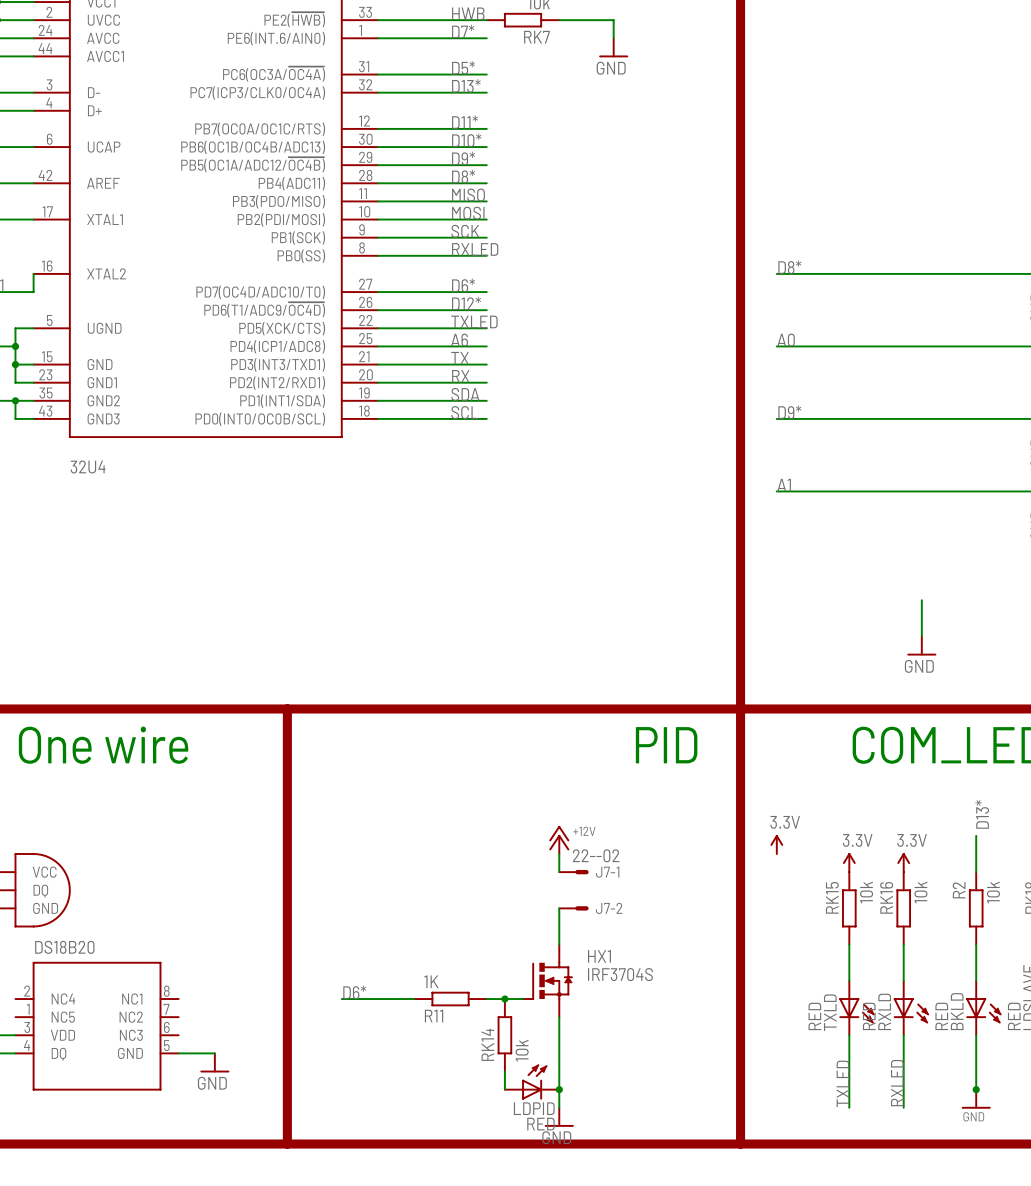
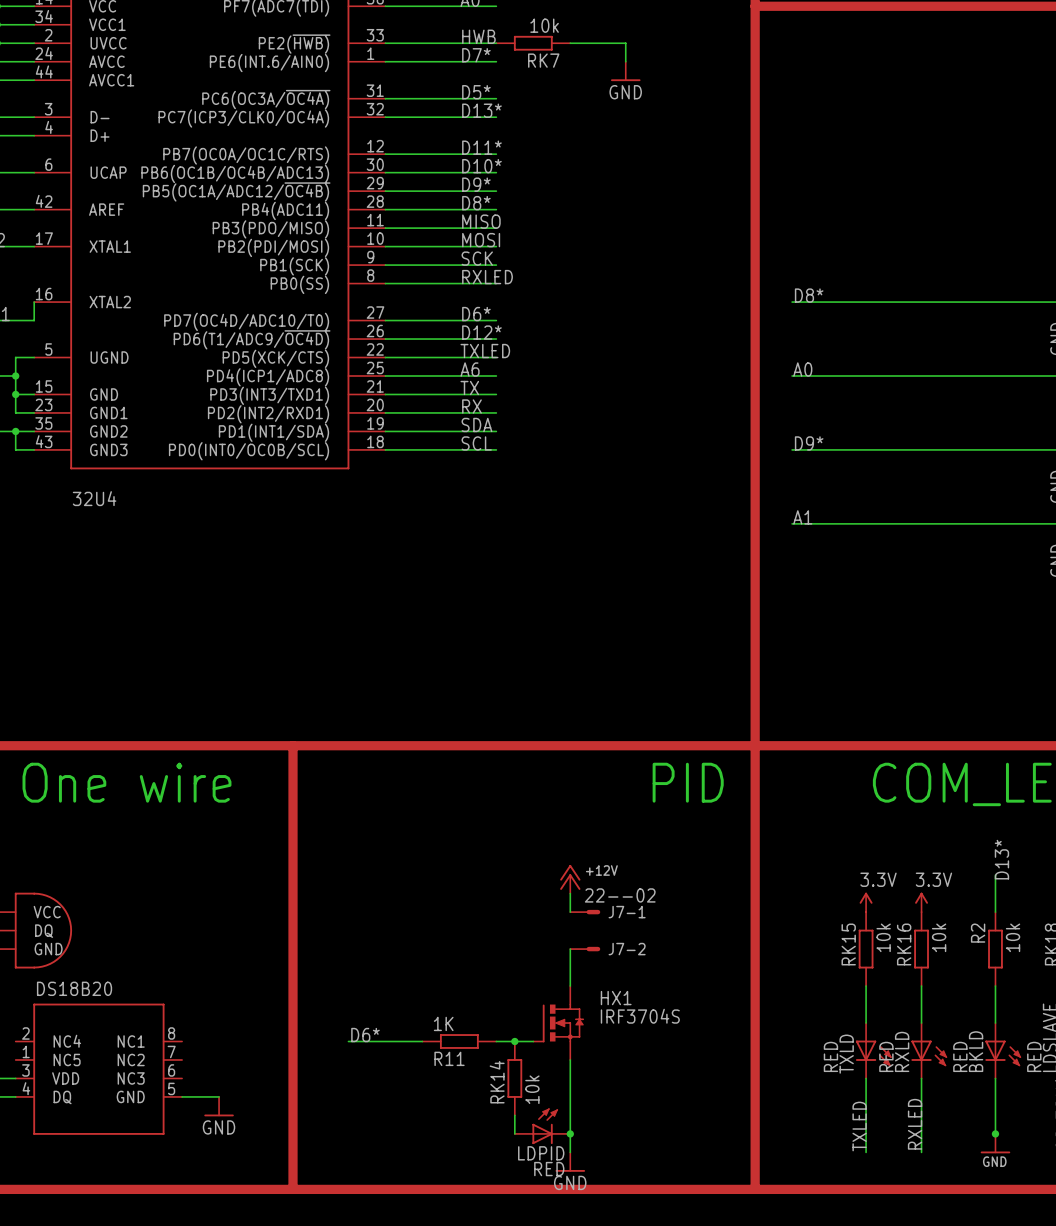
wire: (921, 600) (921, 636) -> none
power symbol: GND (921, 645) -> none
power symbol: 3.3V (776, 844) -> none

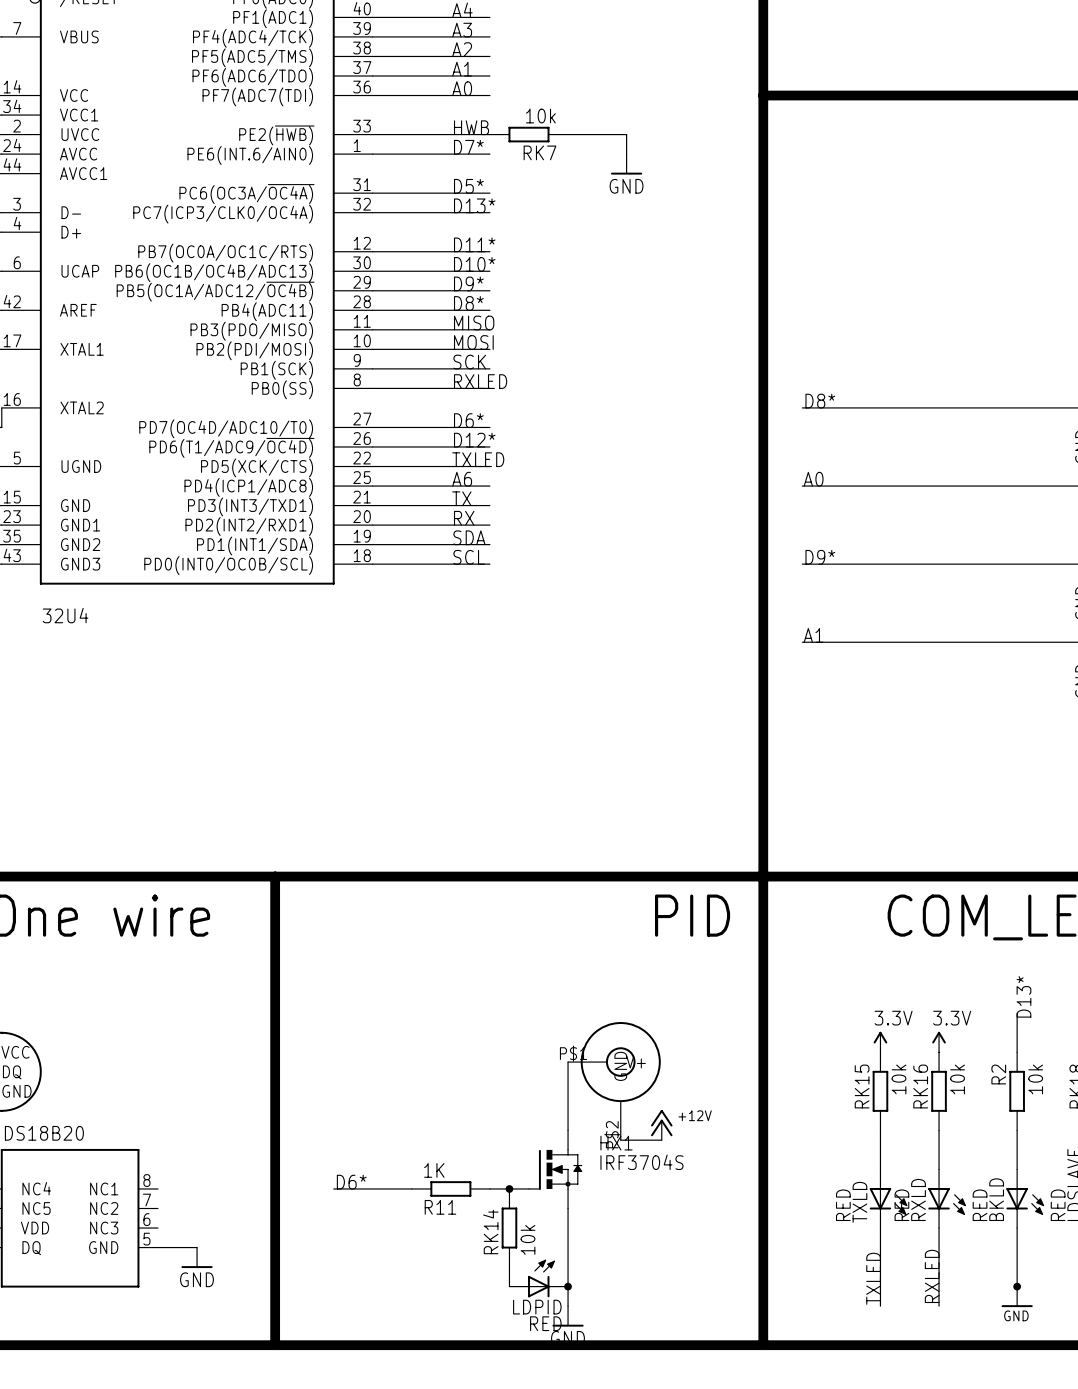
power symbol position: +12V (570, 879) -> +12V (661, 1125)
wire: (570, 893) (570, 912) -> none
J7-1: 22--02 (585, 912) -> none
wire: none -> (568, 1062) (568, 1091)
part: none -> (614, 1081)
J7-2: (585, 949) -> none
wire: none -> (620, 1140) (661, 1140)

